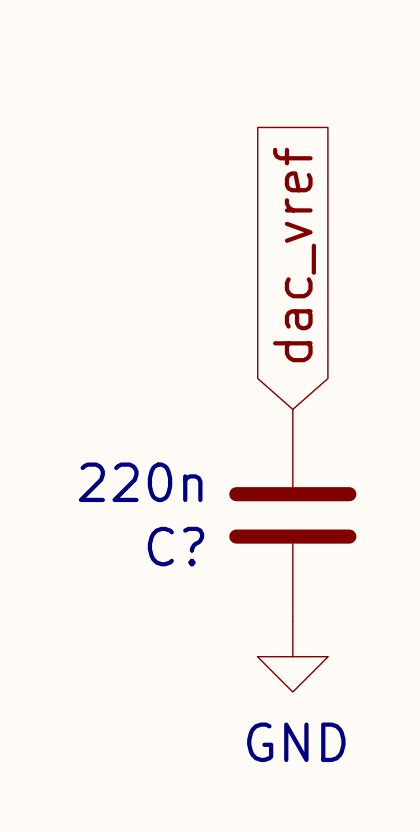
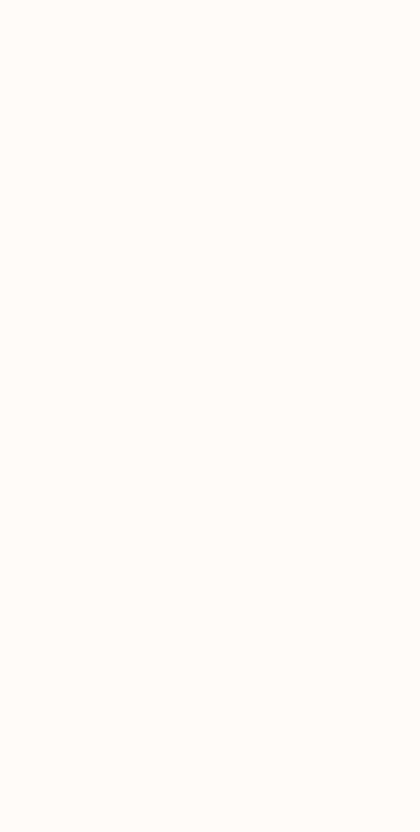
global label: dac_vref (294, 255) -> none
C?: 220n (292, 515) -> none
power symbol: GND (292, 656) -> none

